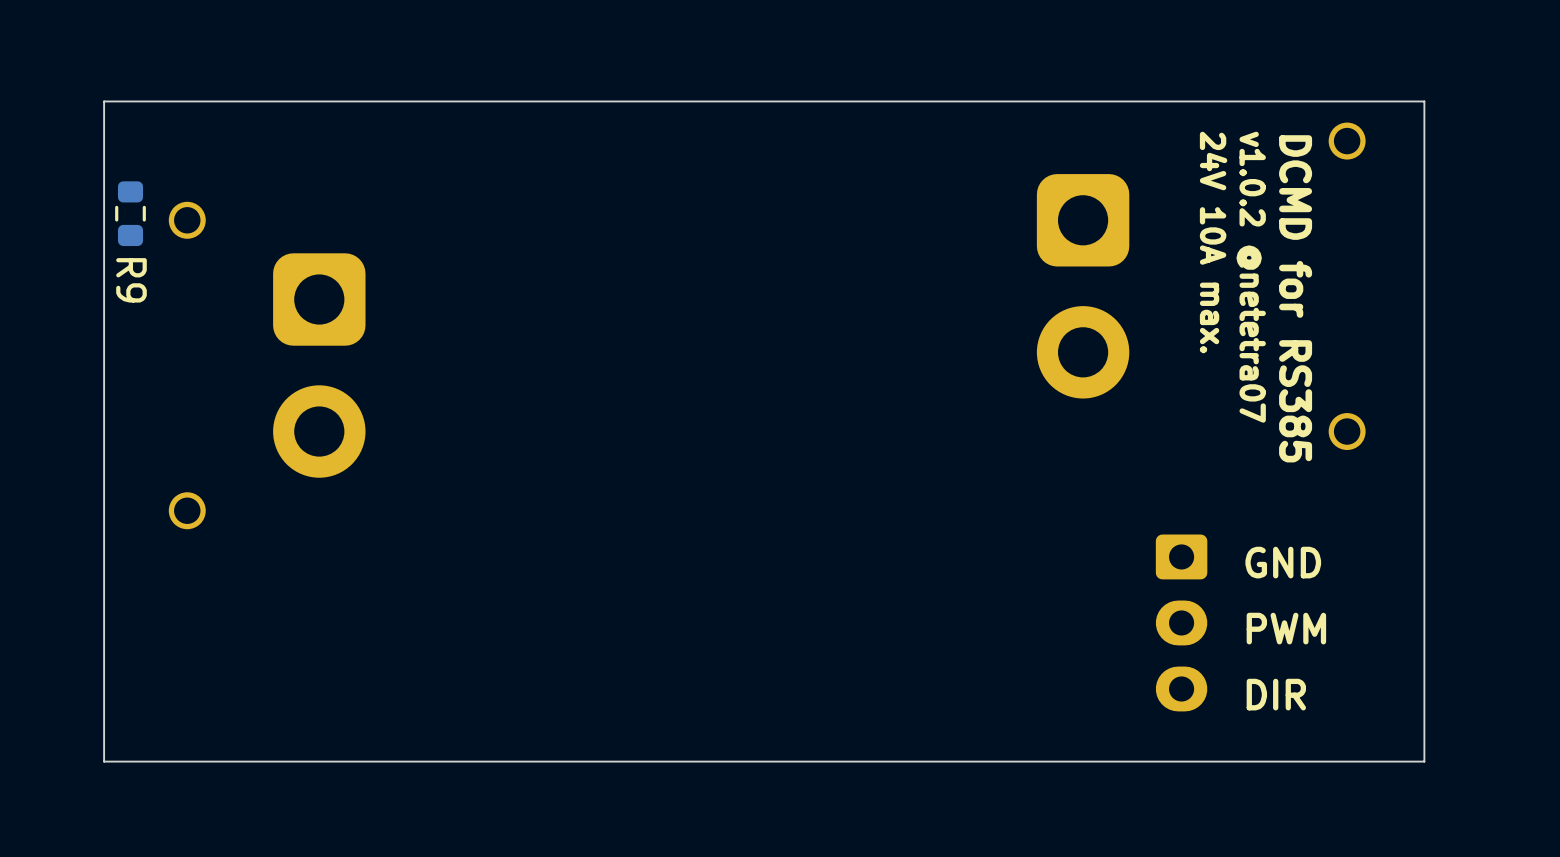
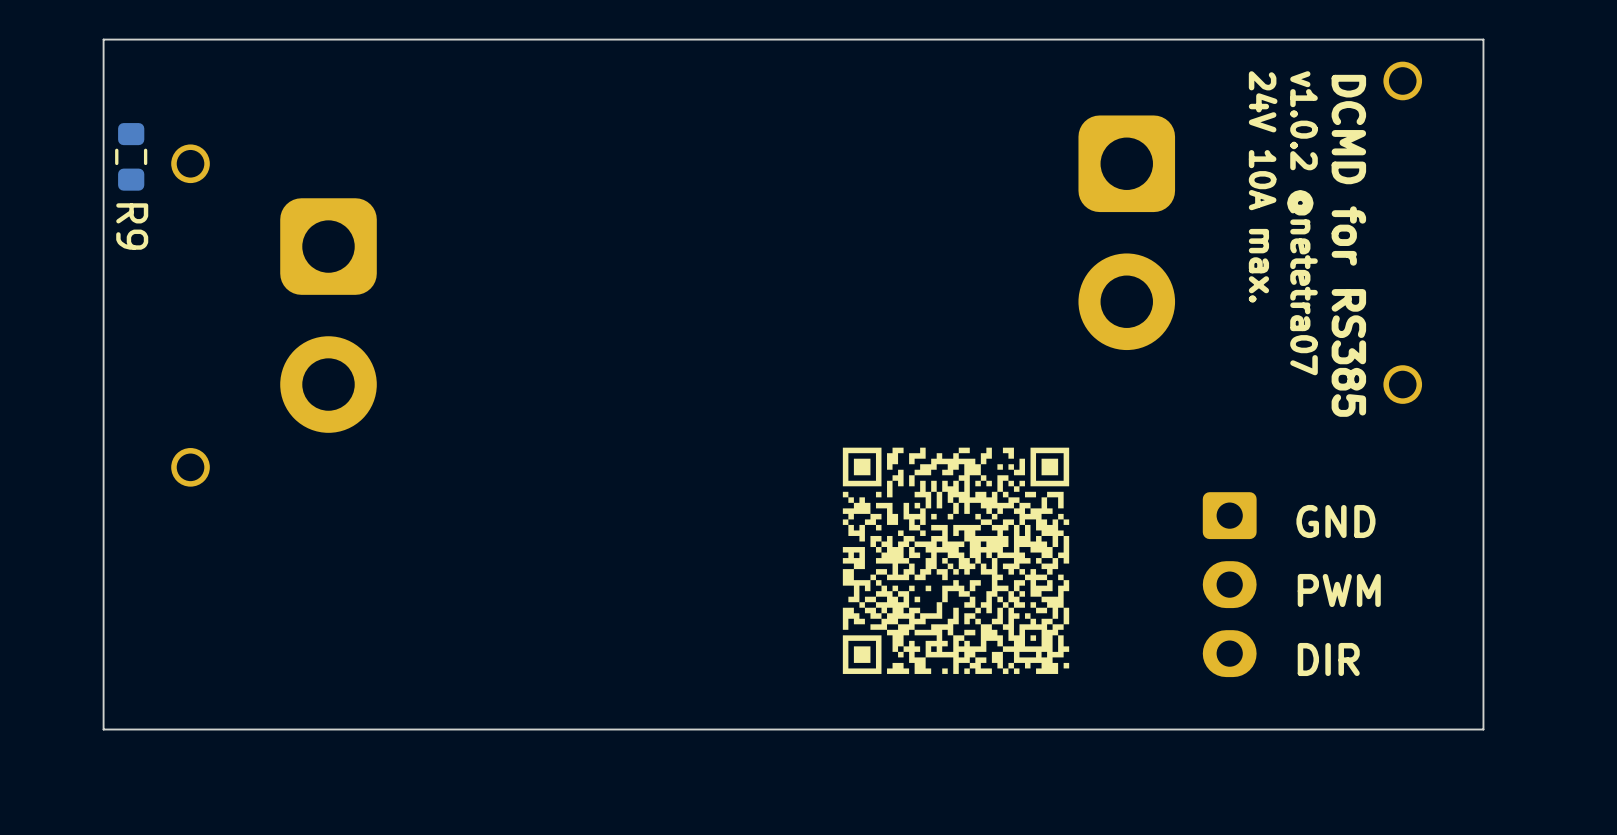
drawing: none -> [842, 447, 1070, 674]

